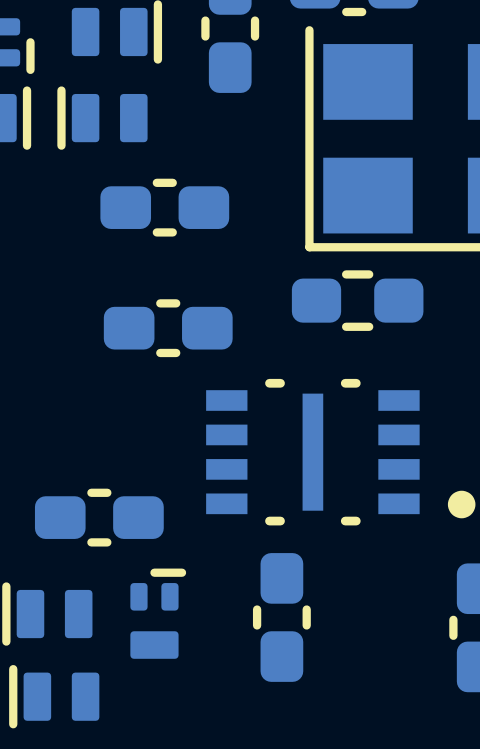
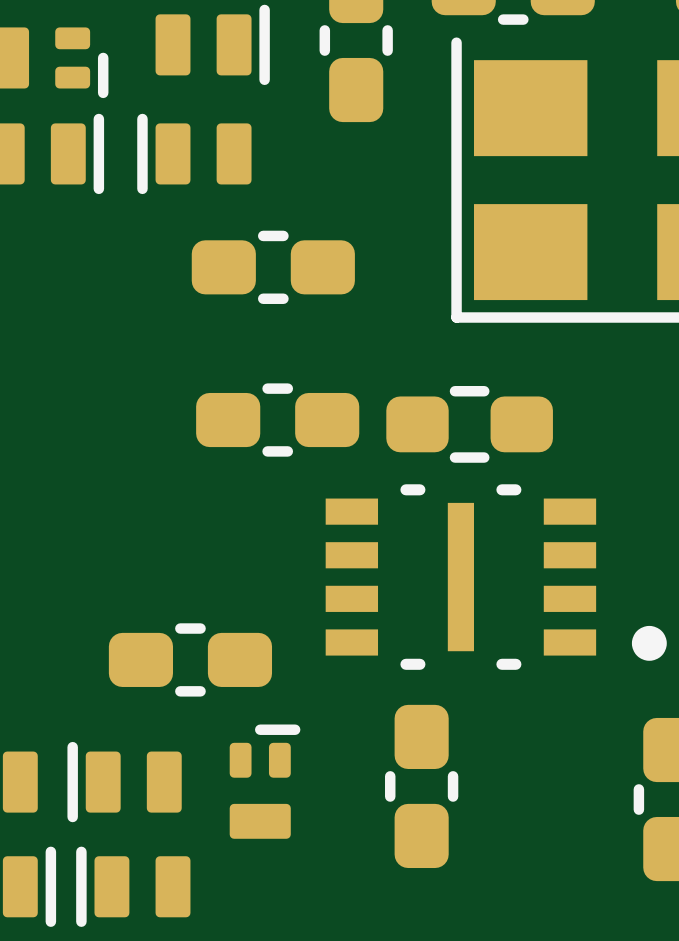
part position: (357, 300) -> (469, 424)

